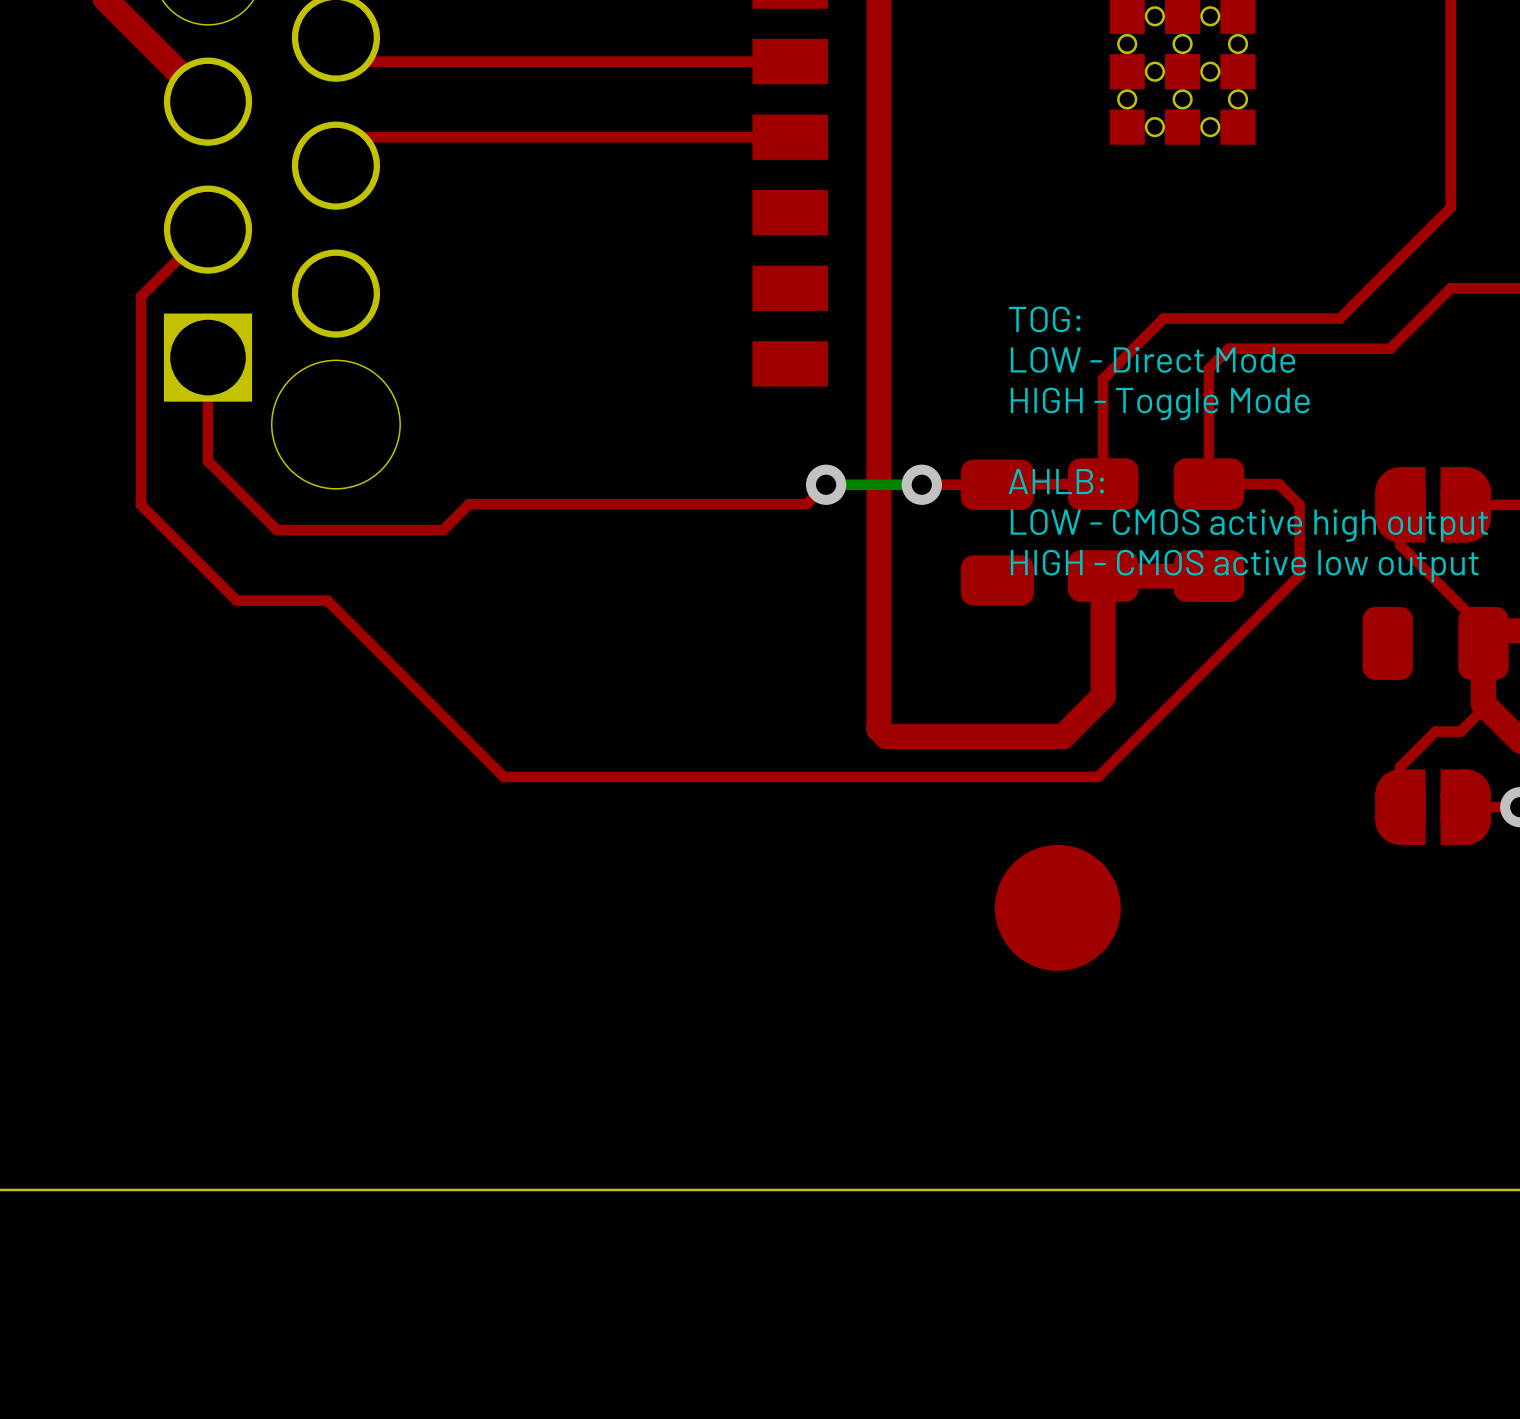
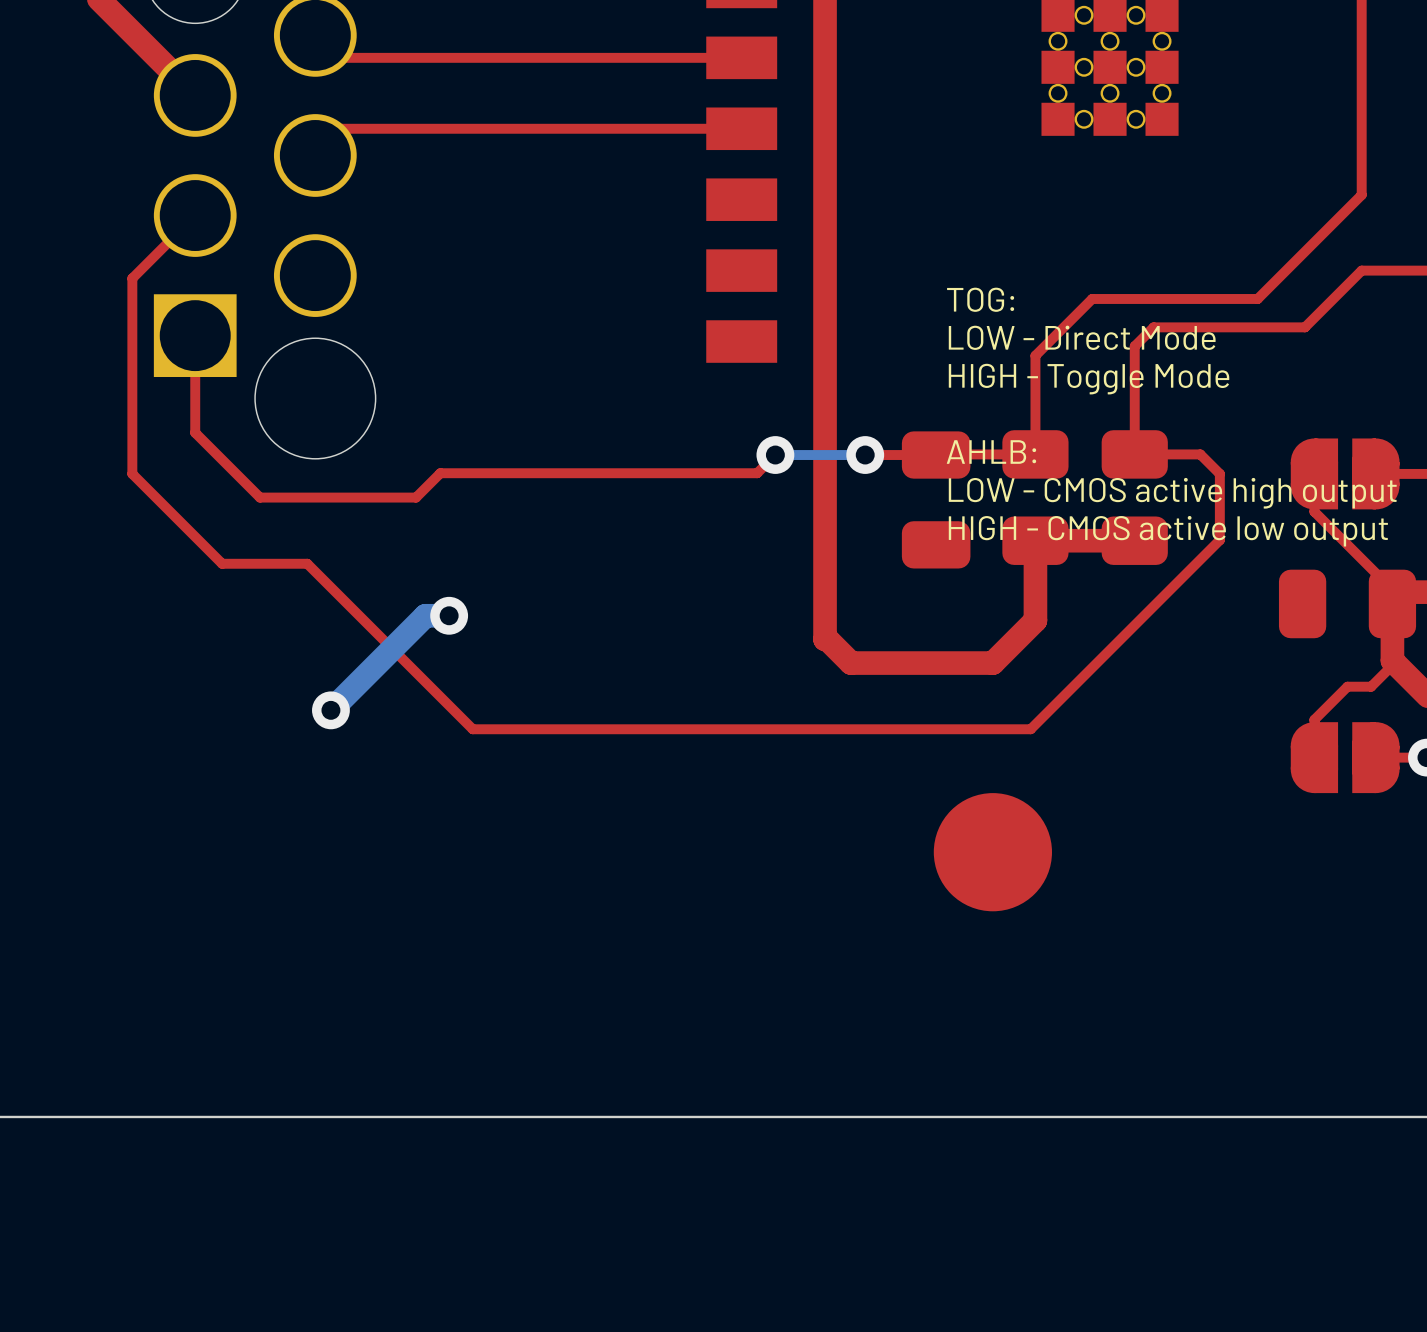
bottom track: none -> (449, 615) (425, 615) (330, 710)
via: none -> (449, 615)
top track: (1103, 661) (1103, 696) (1062, 736) (886, 736) (878, 729) (878, 681) -> (1035, 620) (992, 663) (851, 663) (827, 639) (825, 639)
via: none -> (330, 710)

